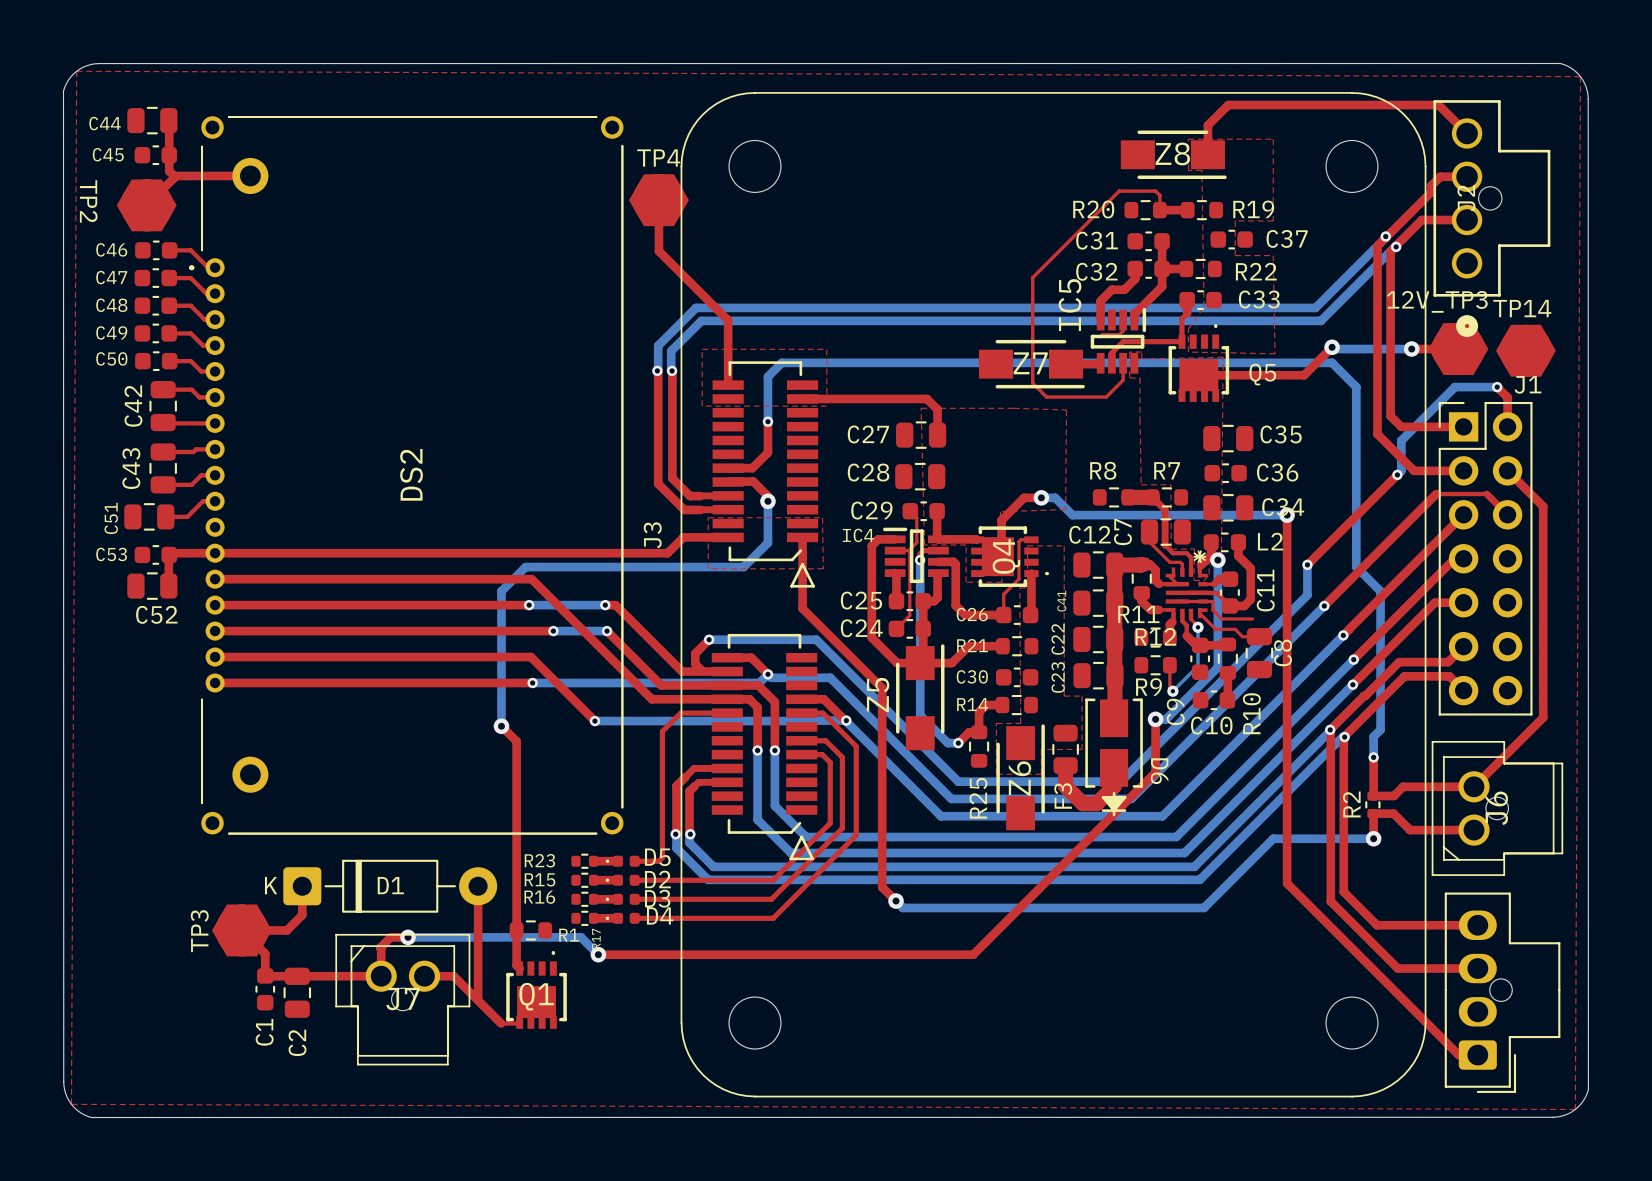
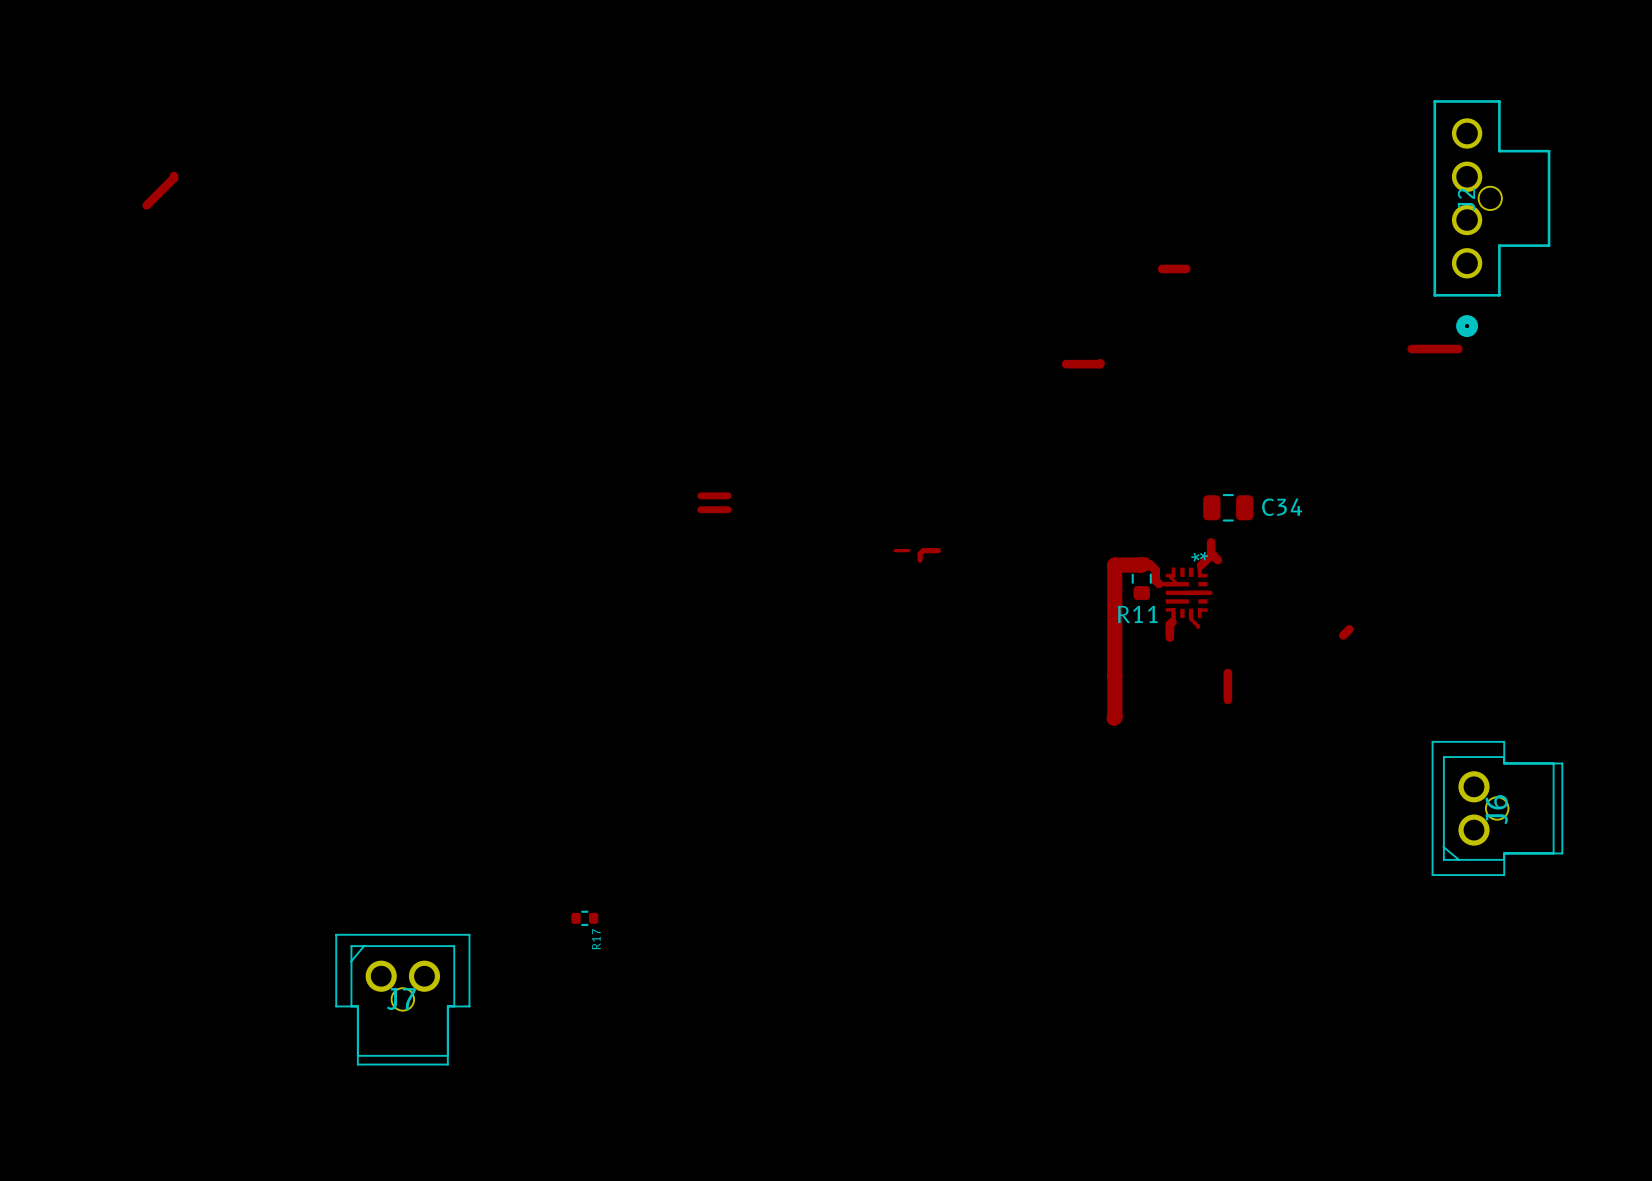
board edge: (99, 63) (1560, 63) (1571, 68) (1582, 79) (1588, 99) (1588, 1089) (1583, 1100) (1568, 1113) (1552, 1117) (91, 1117) (80, 1112) (67, 1097) (63, 1081) (63, 91) (68, 80) (76, 71) (87, 65) (99, 63) -> none
top zone outline: (76, 71) (1580, 76) (1575, 1109) (71, 1104) (76, 71) -> none
C44: (152, 120) -> none
top track: (168, 120) (169, 171) (173, 175) (250, 175) (252, 173) -> none
top track: (1467, 133) (1438, 105) (1228, 105) (1207, 125) (1207, 154) -> none
top zone outline: (1188, 139) (1188, 170) (1201, 170) (1204, 307) (1188, 328) (1188, 352) (1275, 353) (1273, 255) (1235, 255) (1235, 220) (1273, 220) (1273, 139) (1188, 139) -> none
Z8: (1173, 154) -> none
C45: (155, 155) -> none
top track: (1467, 176) (1440, 176) (1431, 185) (1431, 191) (1377, 245) (1377, 434) (1414, 470) (1463, 470) -> none
top track: (658, 200) (658, 251) (728, 320) (728, 385) -> none
TP4: (658, 200) -> none
TP2: (146, 205) -> none
R20: (1145, 210) -> none
top track: (1187, 210) (1159, 210) (1159, 195) (1155, 191) (1119, 191) (1032, 277) (1032, 383) (1046, 397) (1106, 397) (1123, 380) (1123, 363) -> none
R19: (1201, 210) -> none
top track: (1467, 220) (1421, 220) (1390, 251) (1390, 416) (1401, 426) (1463, 426) -> none
bottom track: (1385, 236) (1315, 307) (696, 307) (658, 345) (657, 370) -> none
via: (1385, 236) -> none
C37: (1231, 239) -> none
C31: (1148, 241) -> none
top track: (1162, 241) (1162, 286) (1134, 314) (1134, 320) -> none
bottom track: (1396, 246) (1320, 320) (701, 320) (671, 351) (672, 370) -> none
via: (1396, 246) -> none
C46: (156, 250) -> none
top track: (169, 250) (190, 250) (208, 267) (215, 267) -> none
top track: (1135, 268) (1135, 278) (1124, 289) (1111, 289) (1100, 301) (1100, 320) -> none
C32: (1148, 268) -> none
R22: (1200, 268) -> none
C47: (155, 278) -> none
top track: (169, 278) (190, 278) (206, 293) (215, 293) -> none
top track: (1187, 300) (1187, 313) (1181, 318) (1181, 341) (1123, 341) (1111, 352) (1111, 363) -> none
C33: (1200, 300) -> none
C48: (155, 305) -> none
top track: (169, 305) (190, 305) (204, 319) (215, 319) -> none
top track: (1123, 320) (1123, 330) (1119, 334) (1102, 334) (1100, 336) -> none
C49: (155, 333) -> none
top track: (169, 333) (190, 333) (202, 345) (215, 345) -> none
IC5: (1118, 340) -> none
top track: (1332, 347) (1304, 375) (1198, 375) -> none
bottom track: (1332, 347) (1333, 349) (1411, 349) -> none
via: (1332, 347) -> none
top zone outline: (702, 349) (826, 349) (826, 406) (702, 406) (702, 349) -> none
via: (1411, 349) -> none
12V_TP3: (1458, 349) -> none
TP14: (1525, 350) -> none
top zone outline: (1129, 352) (1141, 352) (1141, 358) (1223, 357) (1221, 552) (1209, 552) (1209, 574) (1204, 580) (1194, 580) (1194, 548) (1171, 549) (1170, 484) (1141, 484) (1140, 378) (1129, 378) (1129, 352) -> none
C50: (156, 361) -> none
top track: (169, 361) (190, 361) (201, 371) (215, 371) -> none
Q5: (1198, 363) -> none
Z7: (1031, 364) -> none
top track: (657, 370) (658, 483) (684, 509) (700, 509) -> none
via: (657, 370) -> none
top track: (672, 370) (672, 478) (690, 496) (700, 496) -> none
via: (672, 370) -> none
top track: (1497, 387) (1507, 397) (1507, 426) -> none
bottom track: (1497, 387) (1454, 387) (1401, 440) (1401, 471) (1397, 474) -> none
via: (1497, 387) -> none
top track: (163, 389) (191, 389) (199, 397) (215, 397) -> none
top track: (802, 398) (926, 398) (937, 409) (937, 435) -> none
C42: (163, 406) -> none
top zone outline: (921, 408) (924, 544) (966, 544) (966, 582) (1002, 582) (1000, 511) (1065, 509) (1066, 410) (921, 408) -> none
top track: (767, 421) (767, 452) (752, 468) (728, 468) -> none
bottom track: (767, 421) (767, 376) (781, 362) (1332, 362) (1356, 387) (1356, 567) (1380, 591) (1380, 729) (1373, 736) (1373, 757) -> none
via: (767, 421) -> none
top track: (163, 422) (215, 423) -> none
C27: (921, 435) -> none
C35: (1228, 438) -> none
top track: (215, 449) (196, 449) (193, 451) (163, 451) -> none
C43: (163, 468) -> none
top track: (1507, 470) (1543, 506) (1543, 717) (1474, 786) (1403, 786) (1393, 796) (1372, 796) (1373, 757) -> none
C36: (1225, 473) -> none
top track: (1397, 474) (1307, 564) -> none
via: (1397, 474) -> none
top track: (215, 475) (201, 475) (191, 484) (163, 484) -> none
DS2: (406, 475) -> none
C28: (920, 476) -> none
top track: (728, 481) (753, 481) (767, 496) (767, 501) -> none
top track: (1041, 497) (1024, 497) (1001, 520) (1001, 552) (997, 556) -> none
bottom track: (1041, 497) (1055, 497) (1072, 515) (1287, 515) -> none
via: (1041, 497) -> none
R8: (1114, 497) -> none
top track: (1128, 497) (1152, 497) (1165, 509) (1165, 545) (1172, 553) (1186, 553) (1191, 557) (1191, 572) -> none
R7: (1166, 497) -> none
top track: (215, 501) (202, 501) (187, 516) (165, 516) -> none
bottom track: (767, 501) (767, 542) (743, 567) (525, 567) (501, 591) (501, 726) -> none
via: (767, 501) -> none
top track: (910, 511) (916, 517) (916, 542) (908, 550) (909, 615) (896, 628) -> none
C29: (923, 511) -> none
top track: (937, 511) (938, 539) (976, 539) -> none
top track: (1463, 514) (1349, 629) -> none
top track: (1507, 514) (1486, 494) (1436, 494) (1324, 605) -> none
top track: (1287, 515) (1287, 883) (1458, 1055) (1477, 1055) -> none
via: (1287, 515) -> none
C51: (149, 516) -> none
top zone outline: (708, 517) (822, 517) (823, 568) (708, 568) (708, 517) -> none
top track: (1149, 532) (1149, 541) (1169, 562) (1180, 562) (1182, 564) (1182, 572) -> none
C7: (1165, 532) -> none
top track: (728, 537) (683, 537) (667, 553) (170, 553) (168, 555) (168, 586) -> none
top track: (802, 537) (802, 608) (882, 688) (882, 887) (896, 901) -> none
top track: (895, 539) (878, 539) (871, 545) (871, 637) (897, 663) (951, 663) (968, 646) (1002, 646) -> none
top track: (1031, 539) (1020, 539) (1018, 541) (1018, 579) (1003, 594) (1003, 615) (965, 615) (955, 605) (955, 564) (953, 561) (938, 561) -> none
L2: (1224, 542) -> none
top track: (1238, 542) (1238, 556) (1250, 568) (1250, 599) (1244, 605) (1230, 605) (1217, 593) (1210, 593) -> none
top zone outline: (1027, 545) (1027, 587) (1019, 587) (1020, 723) (996, 723) (996, 774) (1041, 774) (1041, 749) (1082, 749) (1082, 696) (1064, 696) (1064, 545) (1027, 545) -> none
C53: (155, 554) -> none
IC4: (915, 555) -> none
Q4: (1009, 556) -> none
top track: (1463, 558) (1454, 558) (1353, 659) -> none
J1: (1485, 558) -> none
bottom track: (920, 560) (920, 715) (947, 743) (958, 743) -> none
via: (920, 560) -> none
bottom track: (1217, 560) (1217, 667) (1165, 719) (1155, 719) -> none
via: (1217, 560) -> none
bottom track: (1307, 564) (1307, 595) (1120, 781) (958, 781) (816, 639) (709, 639) -> none
via: (1307, 564) -> none
C12: (1098, 565) -> none
top track: (895, 573) (896, 601) -> none
top track: (1031, 573) (1030, 615) -> none
top track: (938, 574) (937, 597) (934, 601) (923, 601) (923, 660) (920, 663) -> none
top track: (215, 579) (531, 579) (651, 699) (749, 699) (757, 707) (757, 750) -> none
top track: (1230, 579) (1219, 579) (1214, 584) (1202, 584) -> none
C52: (152, 586) -> none
C11: (1230, 592) -> none
top track: (1141, 593) (1141, 601) (1150, 609) (1170, 609) -> none
J3: (1053, 594) -> none
C25: (909, 601) -> none
top track: (1177, 601) (1213, 601) (1213, 610) (1221, 618) (1252, 618) -> none
top track: (1463, 602) (1434, 602) (1352, 684) -> none
C41: (1098, 603) -> none
top track: (215, 605) (529, 605) -> none
bottom track: (529, 605) (605, 605) -> none
via: (529, 605) -> none
top track: (605, 605) (615, 605) (682, 671) (727, 671) -> none
via: (605, 605) -> none
bottom track: (1324, 605) (1131, 798) (951, 798) (830, 677) (771, 677) (767, 674) (759, 683) (532, 683) -> none
via: (1324, 605) -> none
top track: (1182, 613) (1182, 621) (1186, 625) (1186, 635) (1196, 645) (1227, 644) -> none
top track: (1199, 613) (1215, 629) (1235, 629) (1242, 636) (1259, 636) -> none
C26: (1017, 615) -> none
bottom track: (1197, 627) (1197, 666) (1172, 691) -> none
via: (1197, 627) -> none
C24: (909, 628) -> none
top track: (215, 631) (553, 631) -> none
bottom track: (553, 631) (607, 631) -> none
via: (553, 631) -> none
top track: (607, 631) (661, 685) (758, 685) (774, 702) (774, 750) -> none
via: (607, 631) -> none
bottom track: (1343, 635) (1162, 816) (941, 816) (846, 720) (594, 721) -> none
via: (1343, 635) -> none
R12: (1155, 637) -> none
top track: (709, 639) (695, 653) (695, 663) (702, 671) -> none
via: (709, 639) -> none
C22: (1098, 639) -> none
R21: (1017, 646) -> none
top track: (1463, 646) (1448, 662) (1399, 662) (1330, 729) (1330, 901) (1397, 968) (1477, 968) -> none
C8: (1259, 653) -> none
top track: (215, 657) (530, 657) (594, 721) -> none
top track: (727, 657) (751, 657) (767, 674) -> none
C9: (1200, 658) -> none
R10: (1227, 658) -> none
bottom track: (1353, 659) (1176, 837) (806, 837) (774, 805) (774, 750) -> none
via: (1353, 659) -> none
R9: (1155, 665) -> none
top track: (1169, 665) (1169, 688) (1172, 691) -> none
via: (767, 674) -> none
C23: (1098, 675) -> none
C30: (1017, 677) -> none
top track: (215, 683) (532, 683) -> none
via: (532, 683) -> none
bottom track: (1352, 684) (1184, 853) (790, 853) (757, 819) (757, 750) -> none
via: (1352, 684) -> none
top track: (1463, 690) (1449, 676) (1404, 676) (1344, 736) (1343, 891) (1377, 925) (1477, 925) -> none
via: (1172, 691) -> none
Z5: (920, 697) -> none
top track: (801, 699) (823, 699) (846, 720) -> none
C10: (1214, 700) -> none
top track: (1002, 705) (986, 705) (979, 711) (979, 732) (969, 732) (958, 743) -> none
R14: (1016, 705) -> none
top track: (727, 713) (680, 713) (662, 731) (662, 857) (658, 861) (634, 861) -> none
top track: (801, 713) (822, 713) (856, 746) (856, 835) (773, 918) (634, 918) -> none
top track: (1155, 719) (1155, 772) (973, 954) (598, 954) -> none
via: (1155, 719) -> none
via: (846, 720) -> none
via: (594, 721) -> none
top track: (501, 726) (516, 741) (516, 965) (519, 968) -> none
via: (501, 726) -> none
bottom track: (1330, 729) (1194, 866) (713, 866) (689, 842) (690, 834) -> none
via: (1330, 729) -> none
bottom track: (1344, 737) (1199, 879) (708, 879) (676, 848) (675, 834) -> none
via: (1344, 737) -> none
top track: (801, 740) (825, 740) (842, 757) (842, 828) (771, 899) (634, 899) -> none
via: (958, 743) -> none
R25: (979, 746) -> none
F3: (1065, 749) -> none
via: (757, 750) -> none
via: (774, 750) -> none
top track: (801, 754) (822, 754) (830, 762) (830, 823) (773, 880) (634, 880) -> none
D6: (1114, 757) -> none
via: (1373, 757) -> none
top track: (1065, 765) (1065, 786) (1082, 803) (1096, 803) (1114, 786) (1114, 767) -> none
top track: (727, 768) (694, 768) (676, 786) (675, 834) -> none
Z6: (1020, 777) -> none
top track: (727, 782) (698, 782) (689, 791) (690, 834) -> none
R2: (1372, 804) -> none
top track: (1474, 830) (1410, 830) (1393, 813) (1372, 813) (1373, 838) -> none
via: (675, 834) -> none
via: (690, 834) -> none
bottom track: (1373, 838) (1273, 838) (1204, 907) (902, 907) (896, 901) -> none
via: (1373, 838) -> none
R23: (584, 861) -> none
top track: (593, 861) (617, 861) -> none
D5: (622, 861) -> none
R15: (584, 880) -> none
top track: (593, 880) (617, 880) -> none
D2: (622, 880) -> none
top track: (302, 886) (302, 915) (286, 930) (241, 930) (265, 953) (265, 976) (297, 976) -> none
D1: (390, 886) -> none
top track: (478, 886) (478, 1000) -> none
R16: (584, 899) -> none
top track: (593, 899) (617, 899) -> none
D3: (622, 899) -> none
via: (896, 901) -> none
top track: (593, 918) (617, 918) -> none
D4: (622, 918) -> none
TP3: (241, 930) -> none
R1: (530, 930) -> none
top track: (408, 937) (390, 937) (380, 947) (381, 976) (297, 976) -> none
bottom track: (408, 937) (581, 937) (598, 954) -> none
via: (408, 937) -> none
via: (598, 954) -> none
top track: (424, 976) (453, 976) (501, 1023) (519, 1023) -> none
C1: (265, 989) -> none
Q1: (536, 990) -> none
C2: (297, 992) -> none
part: (1502, 992) -> none

